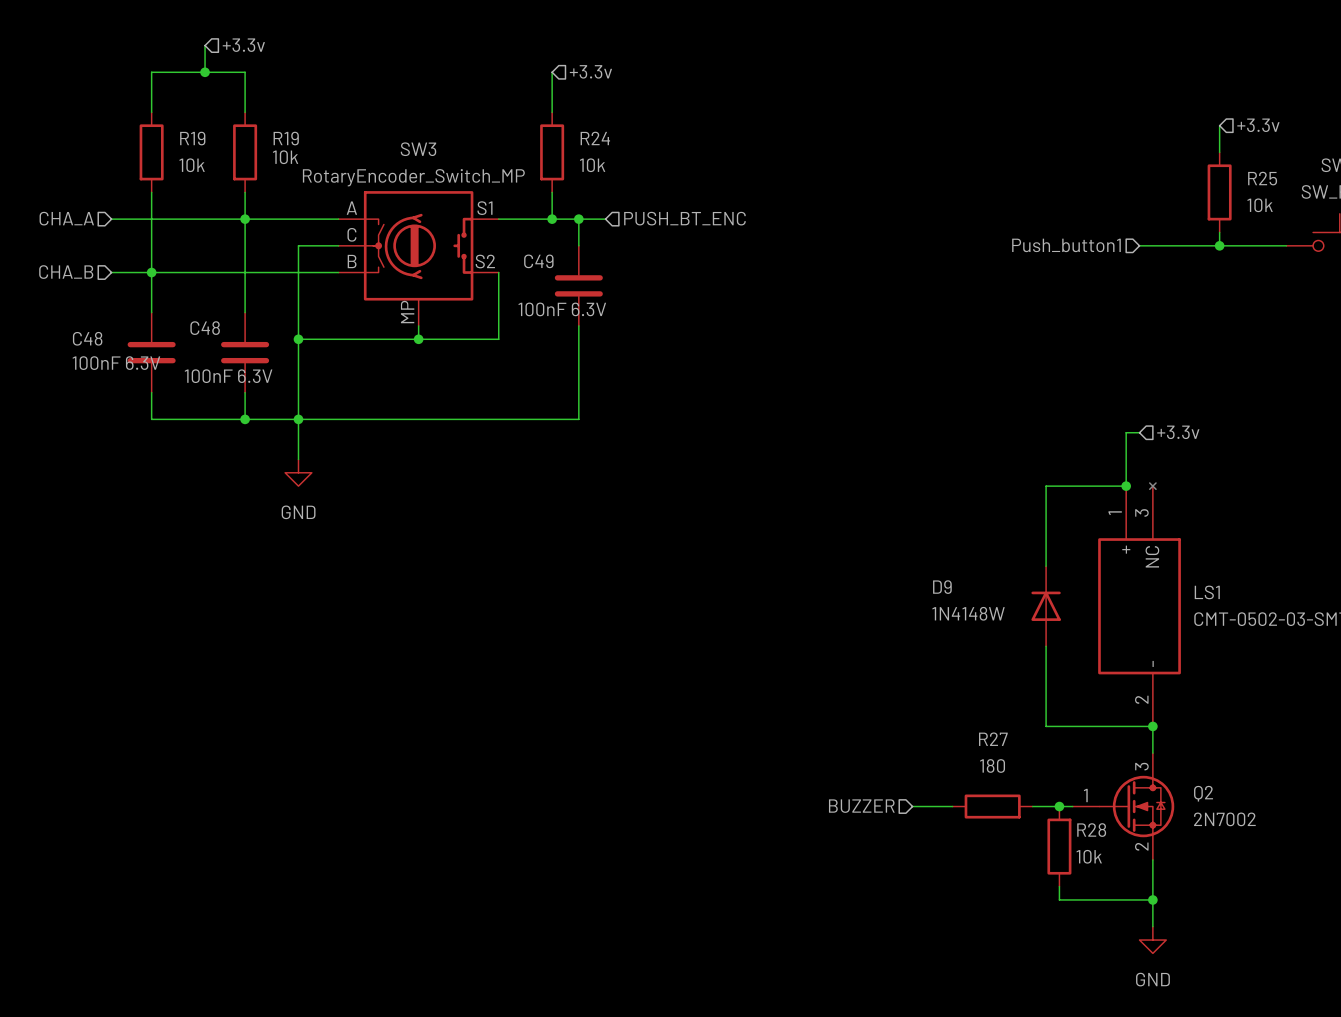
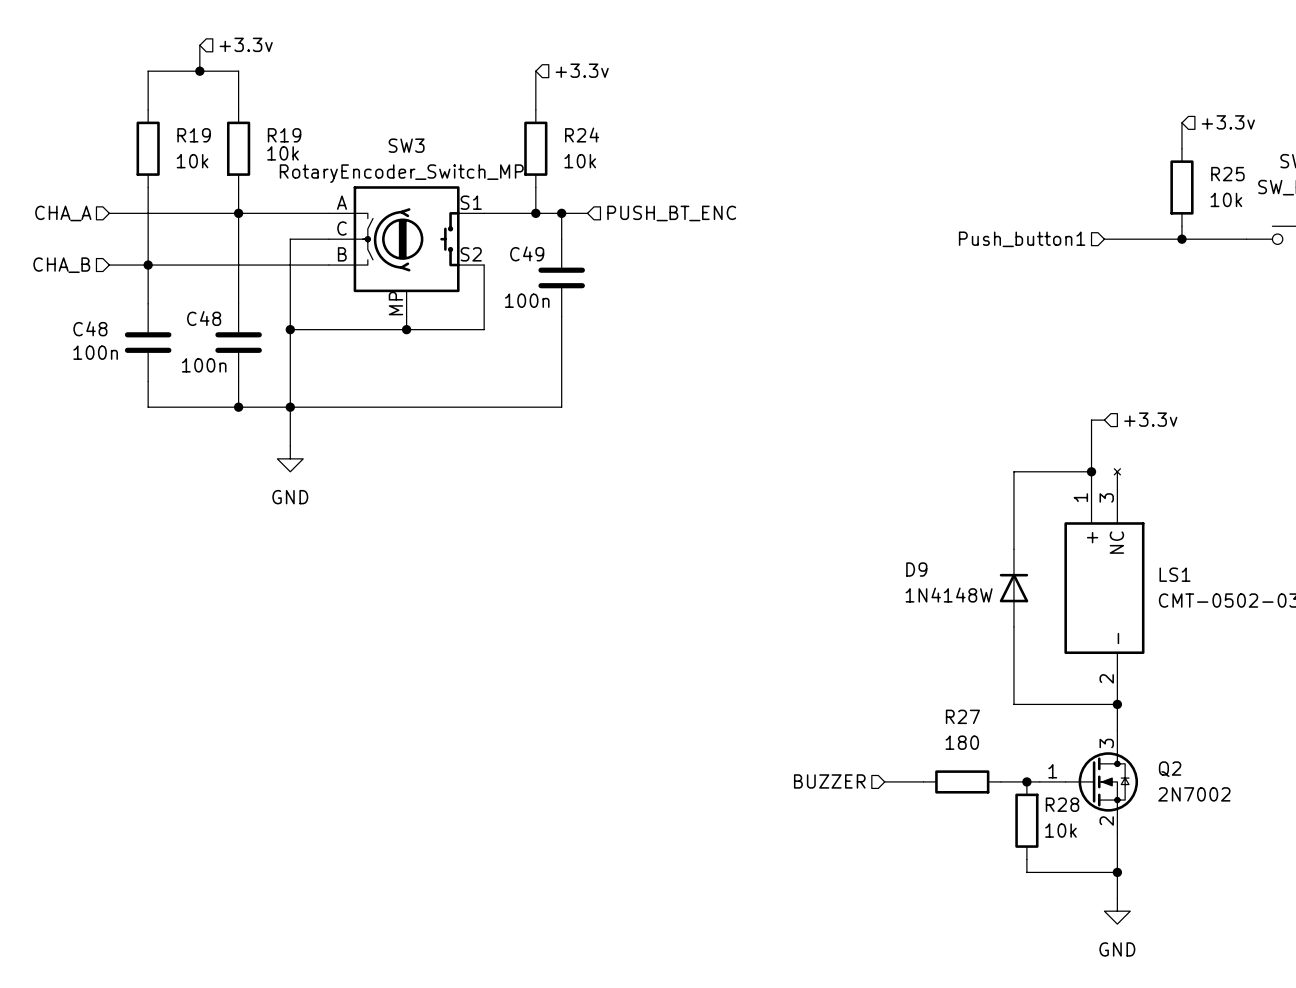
C49 value: 100nF 6.3V (562, 309) -> 100n (527, 300)
C48 value: 100nF 6.3V (116, 363) -> 100n (95, 352)
C48 value: 100nF 6.3V (228, 376) -> 100n (204, 365)

